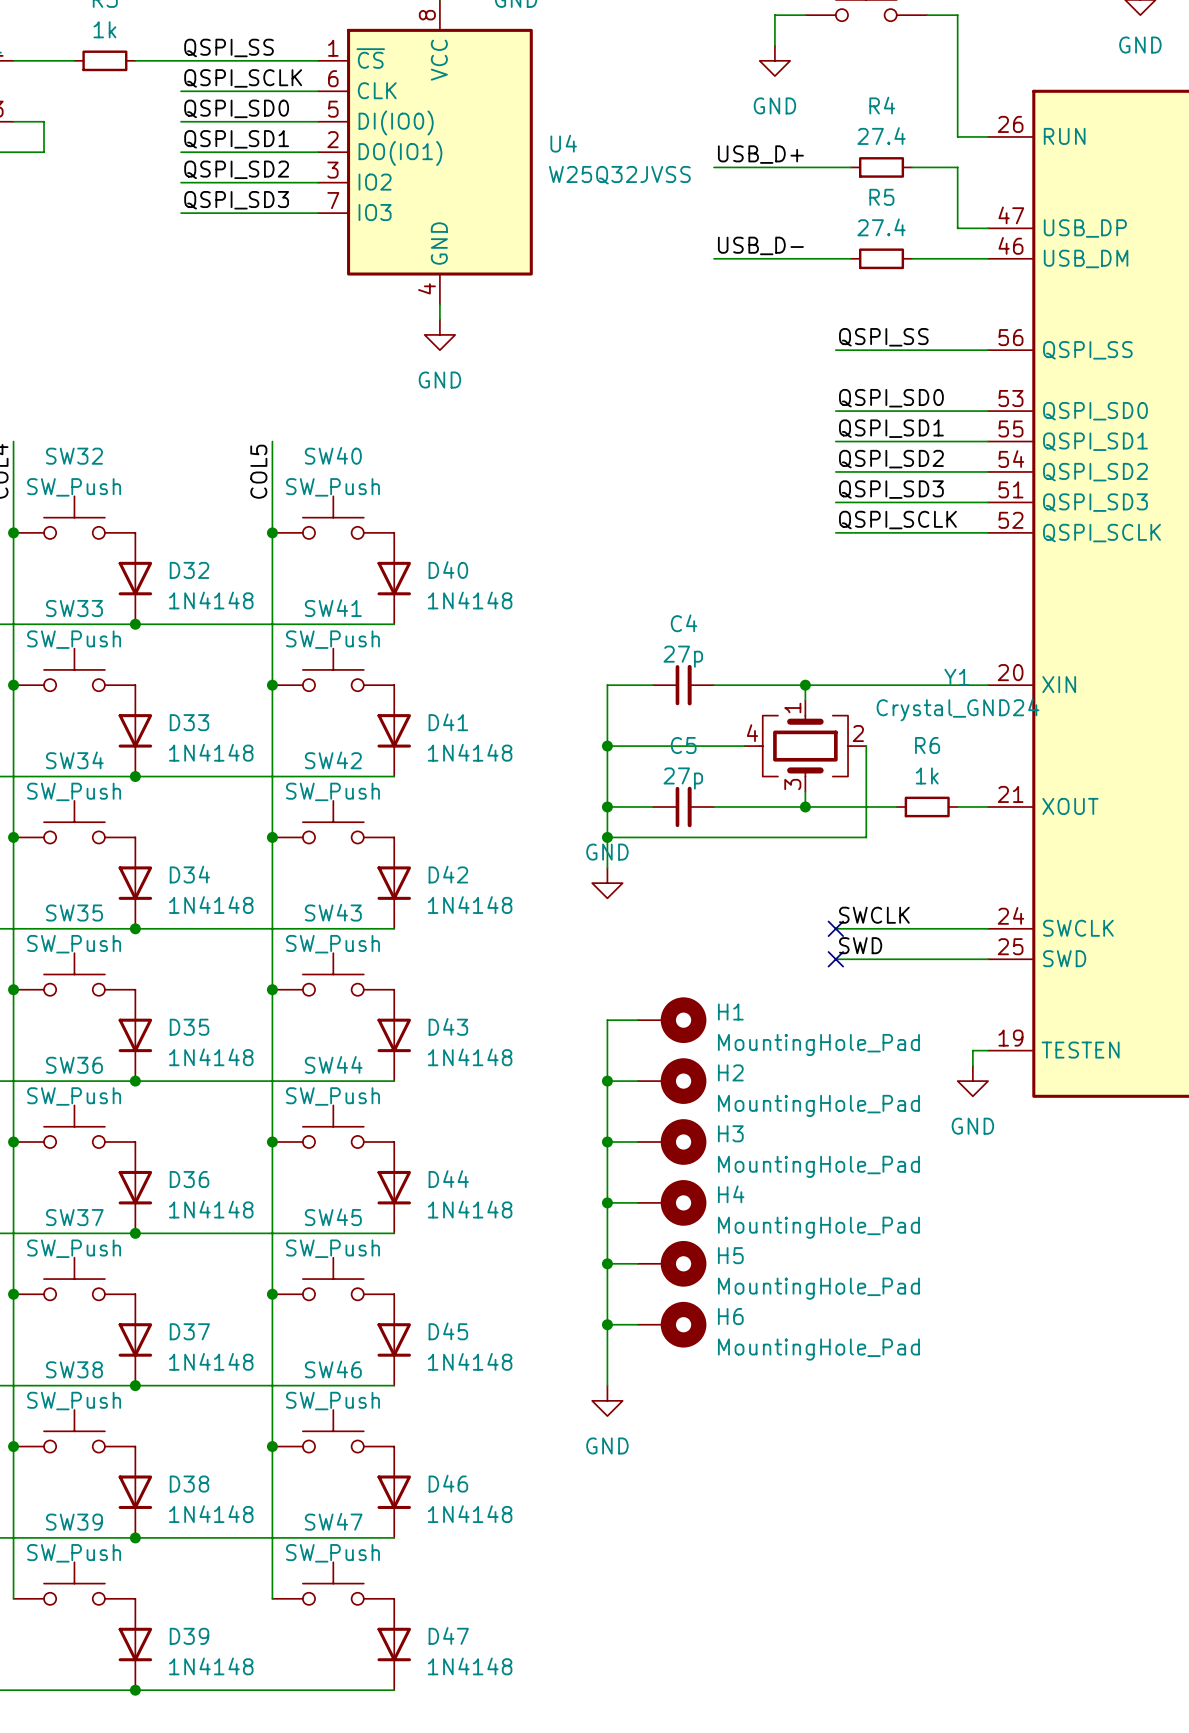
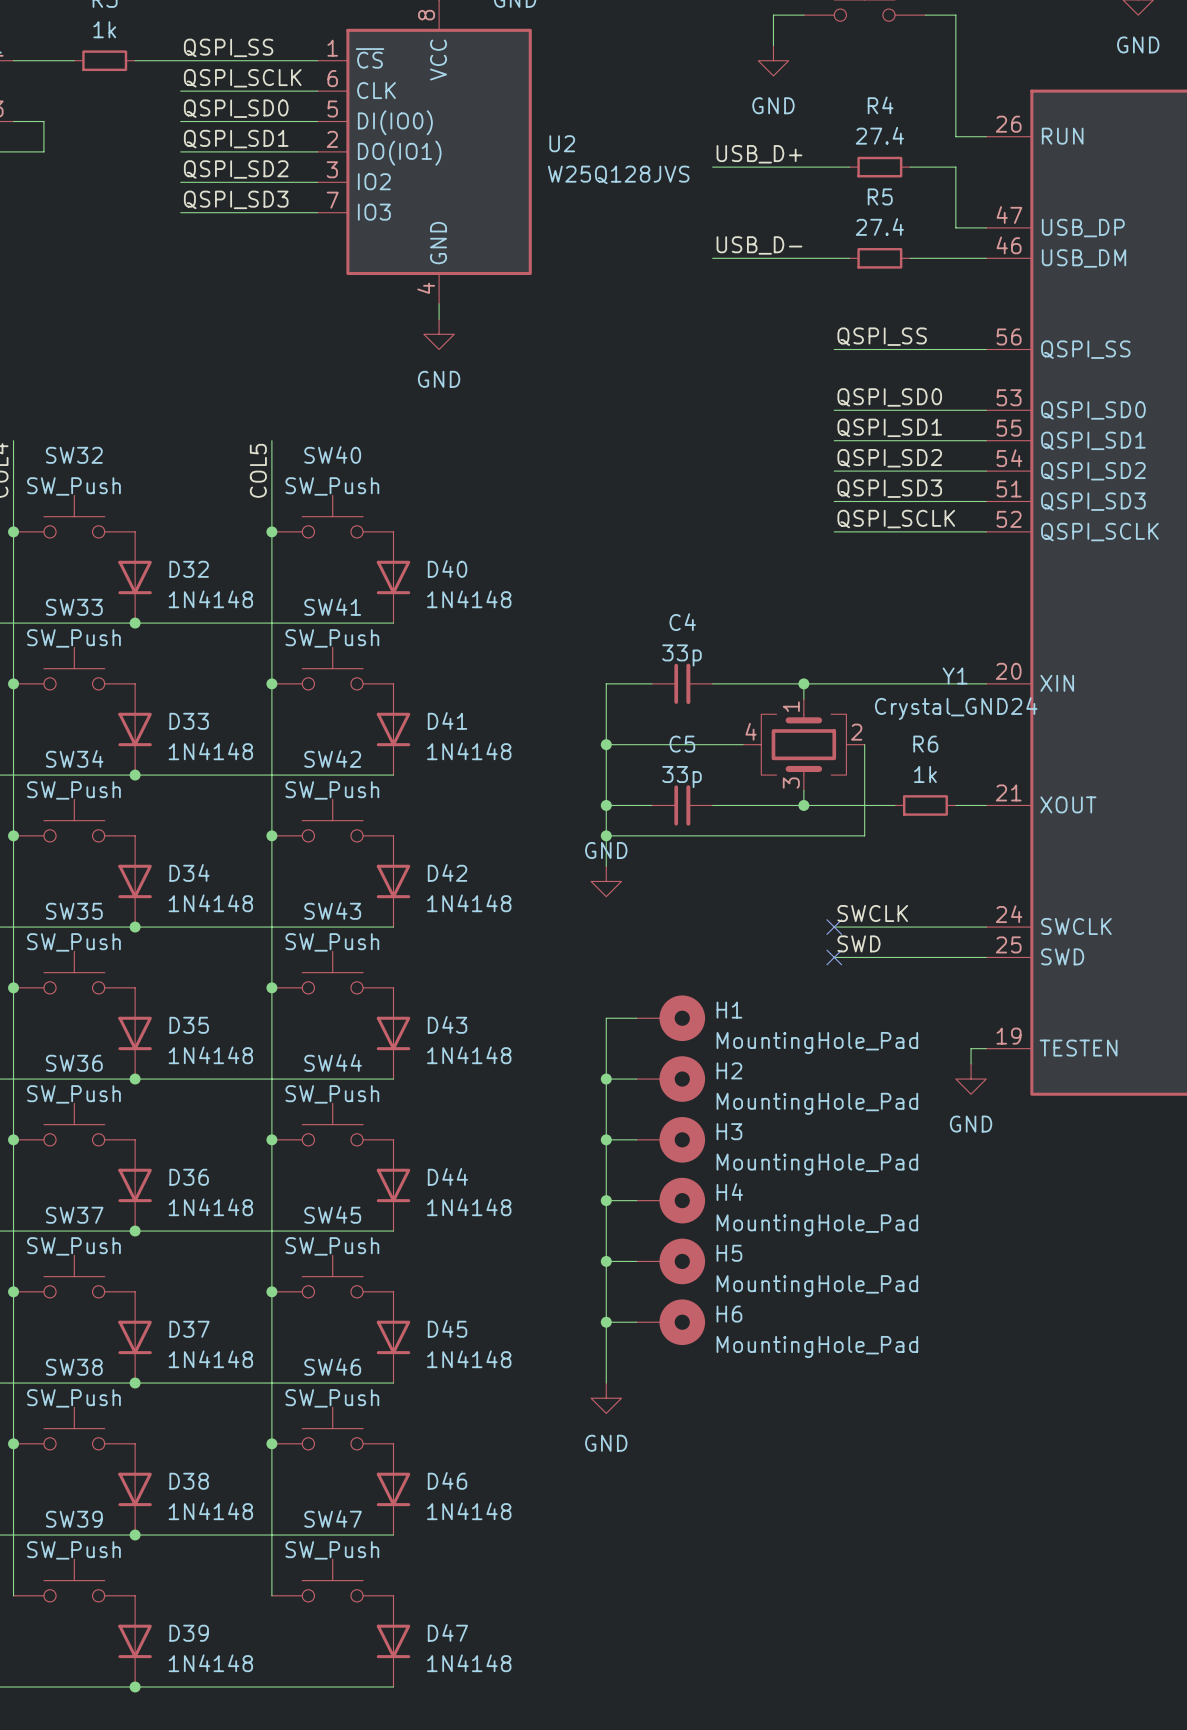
U4 name: U4 (563, 143) -> U2 (562, 143)
U4 value: W25Q32JVSS (619, 175) -> W25Q128JVS (618, 174)
C4 value: 27p (683, 656) -> 33p (681, 655)
C5 value: 27p (683, 778) -> 33p (681, 777)

